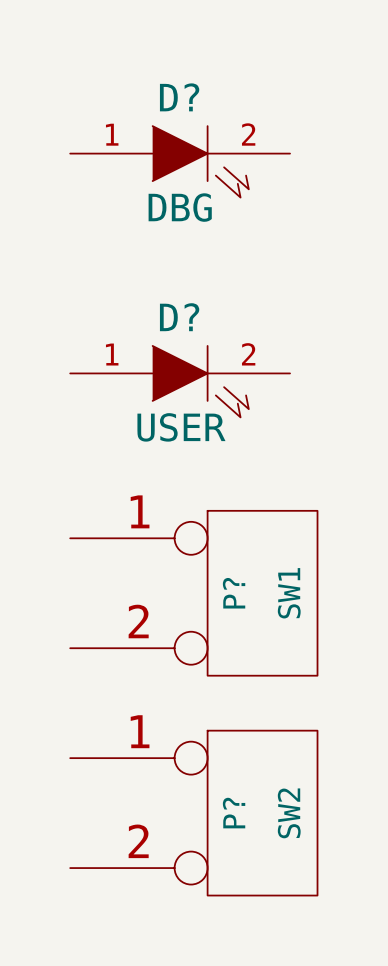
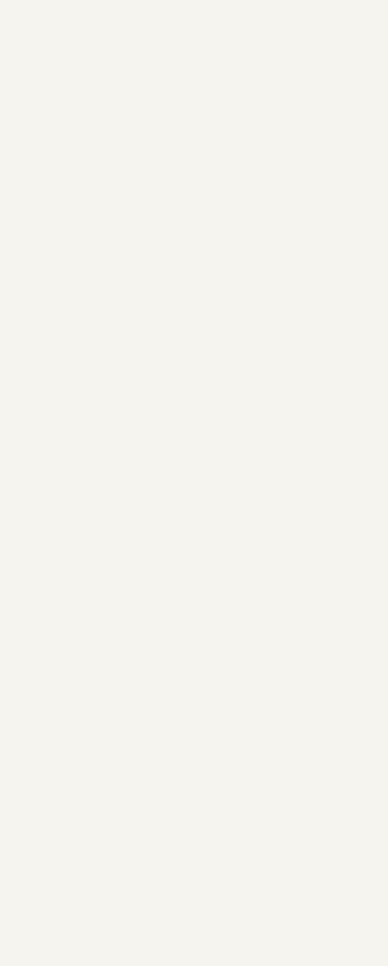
D?: DBG (180, 161) -> none
D?: USER (180, 381) -> none
P?: SW1 (193, 593) -> none
P?: SW2 (193, 813) -> none

